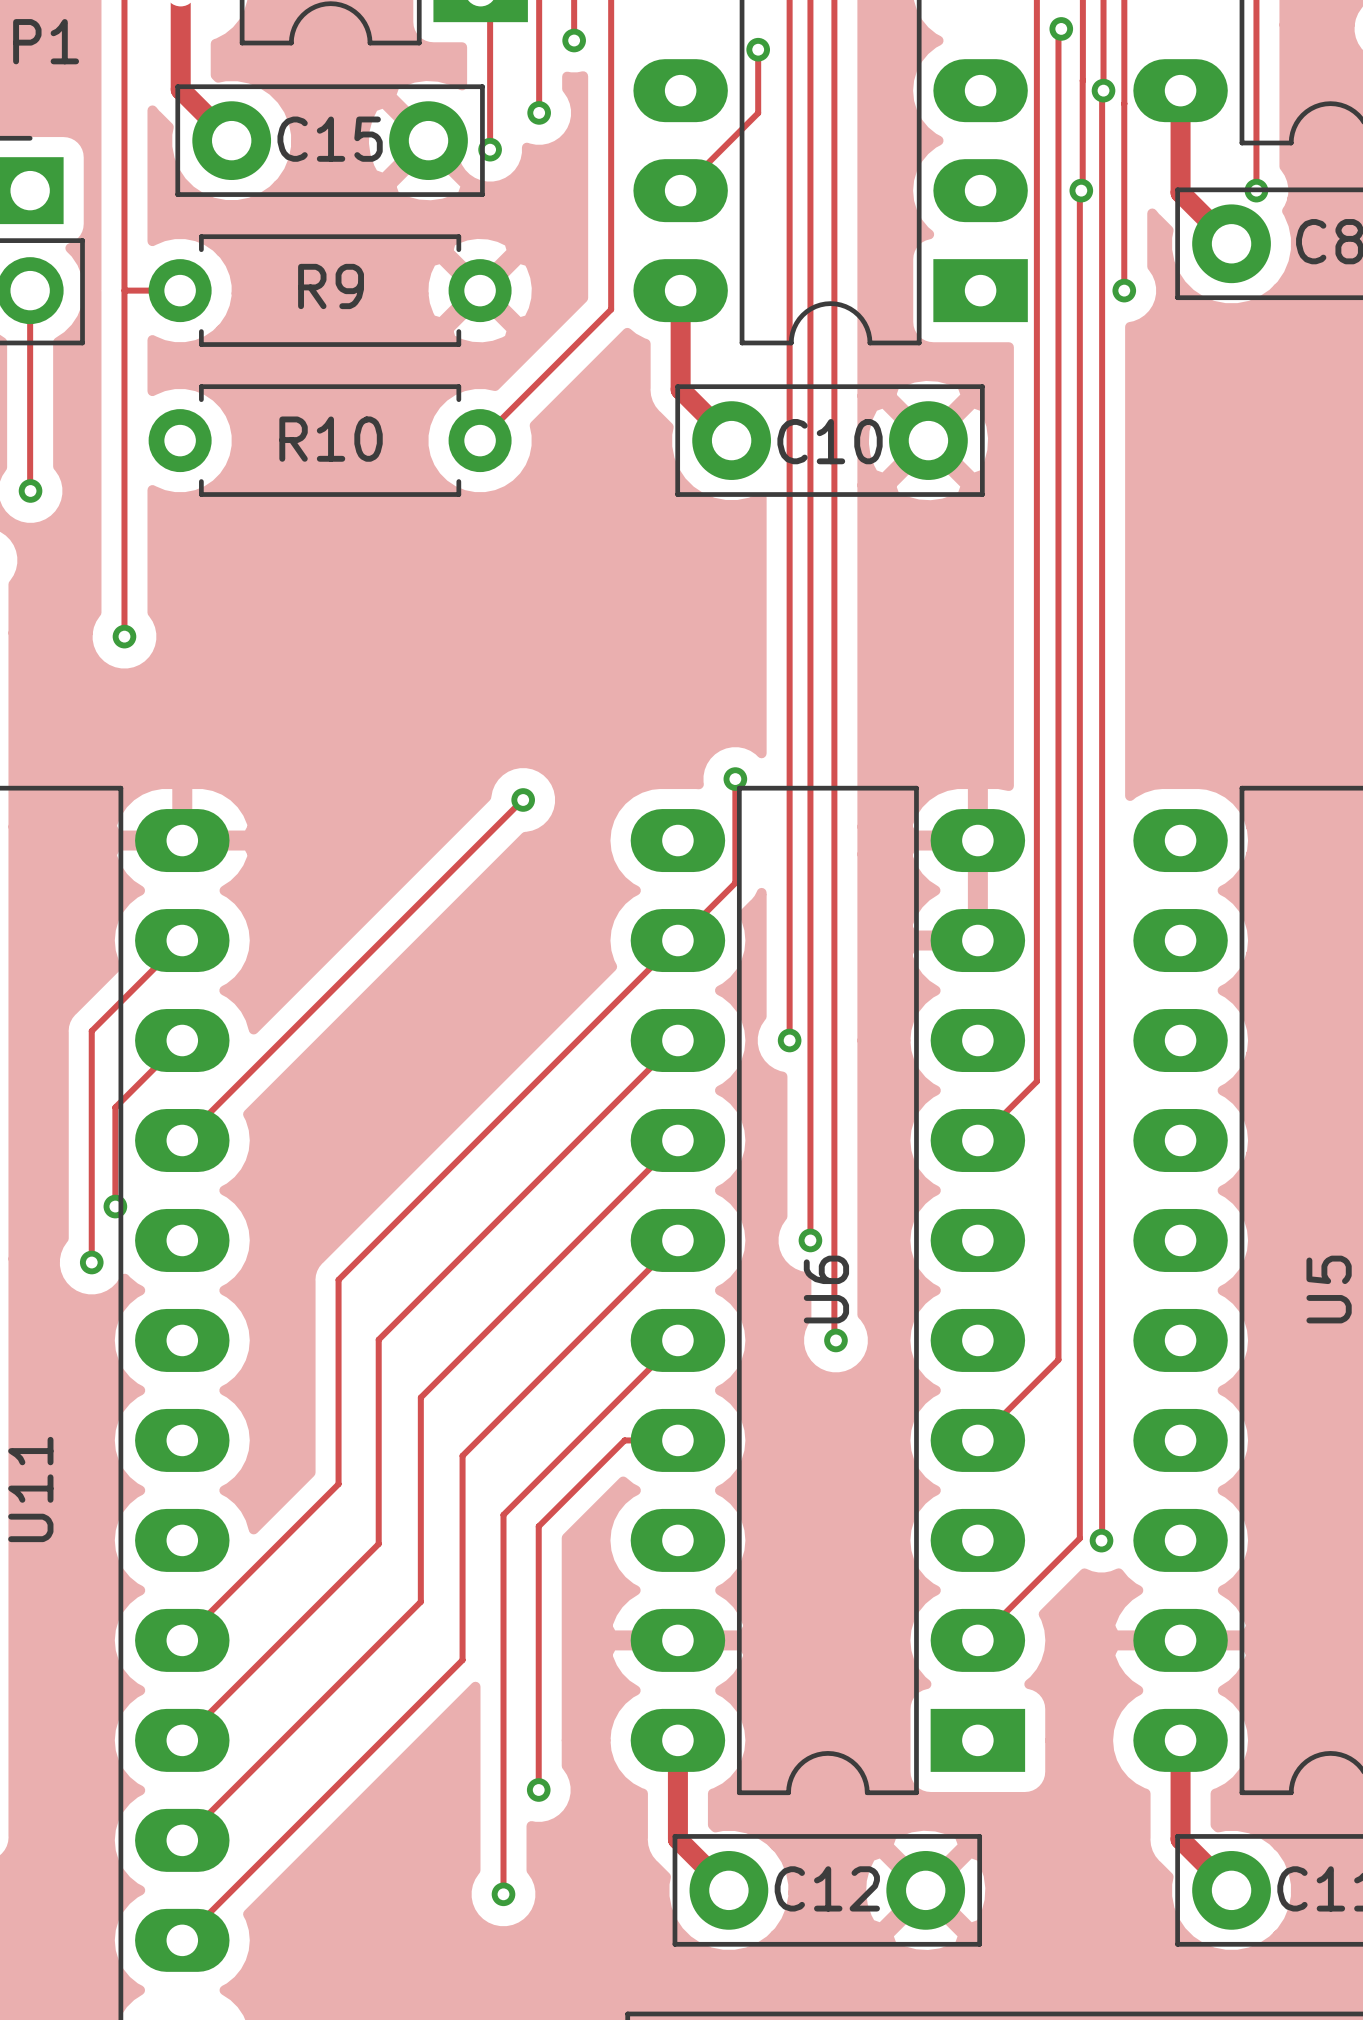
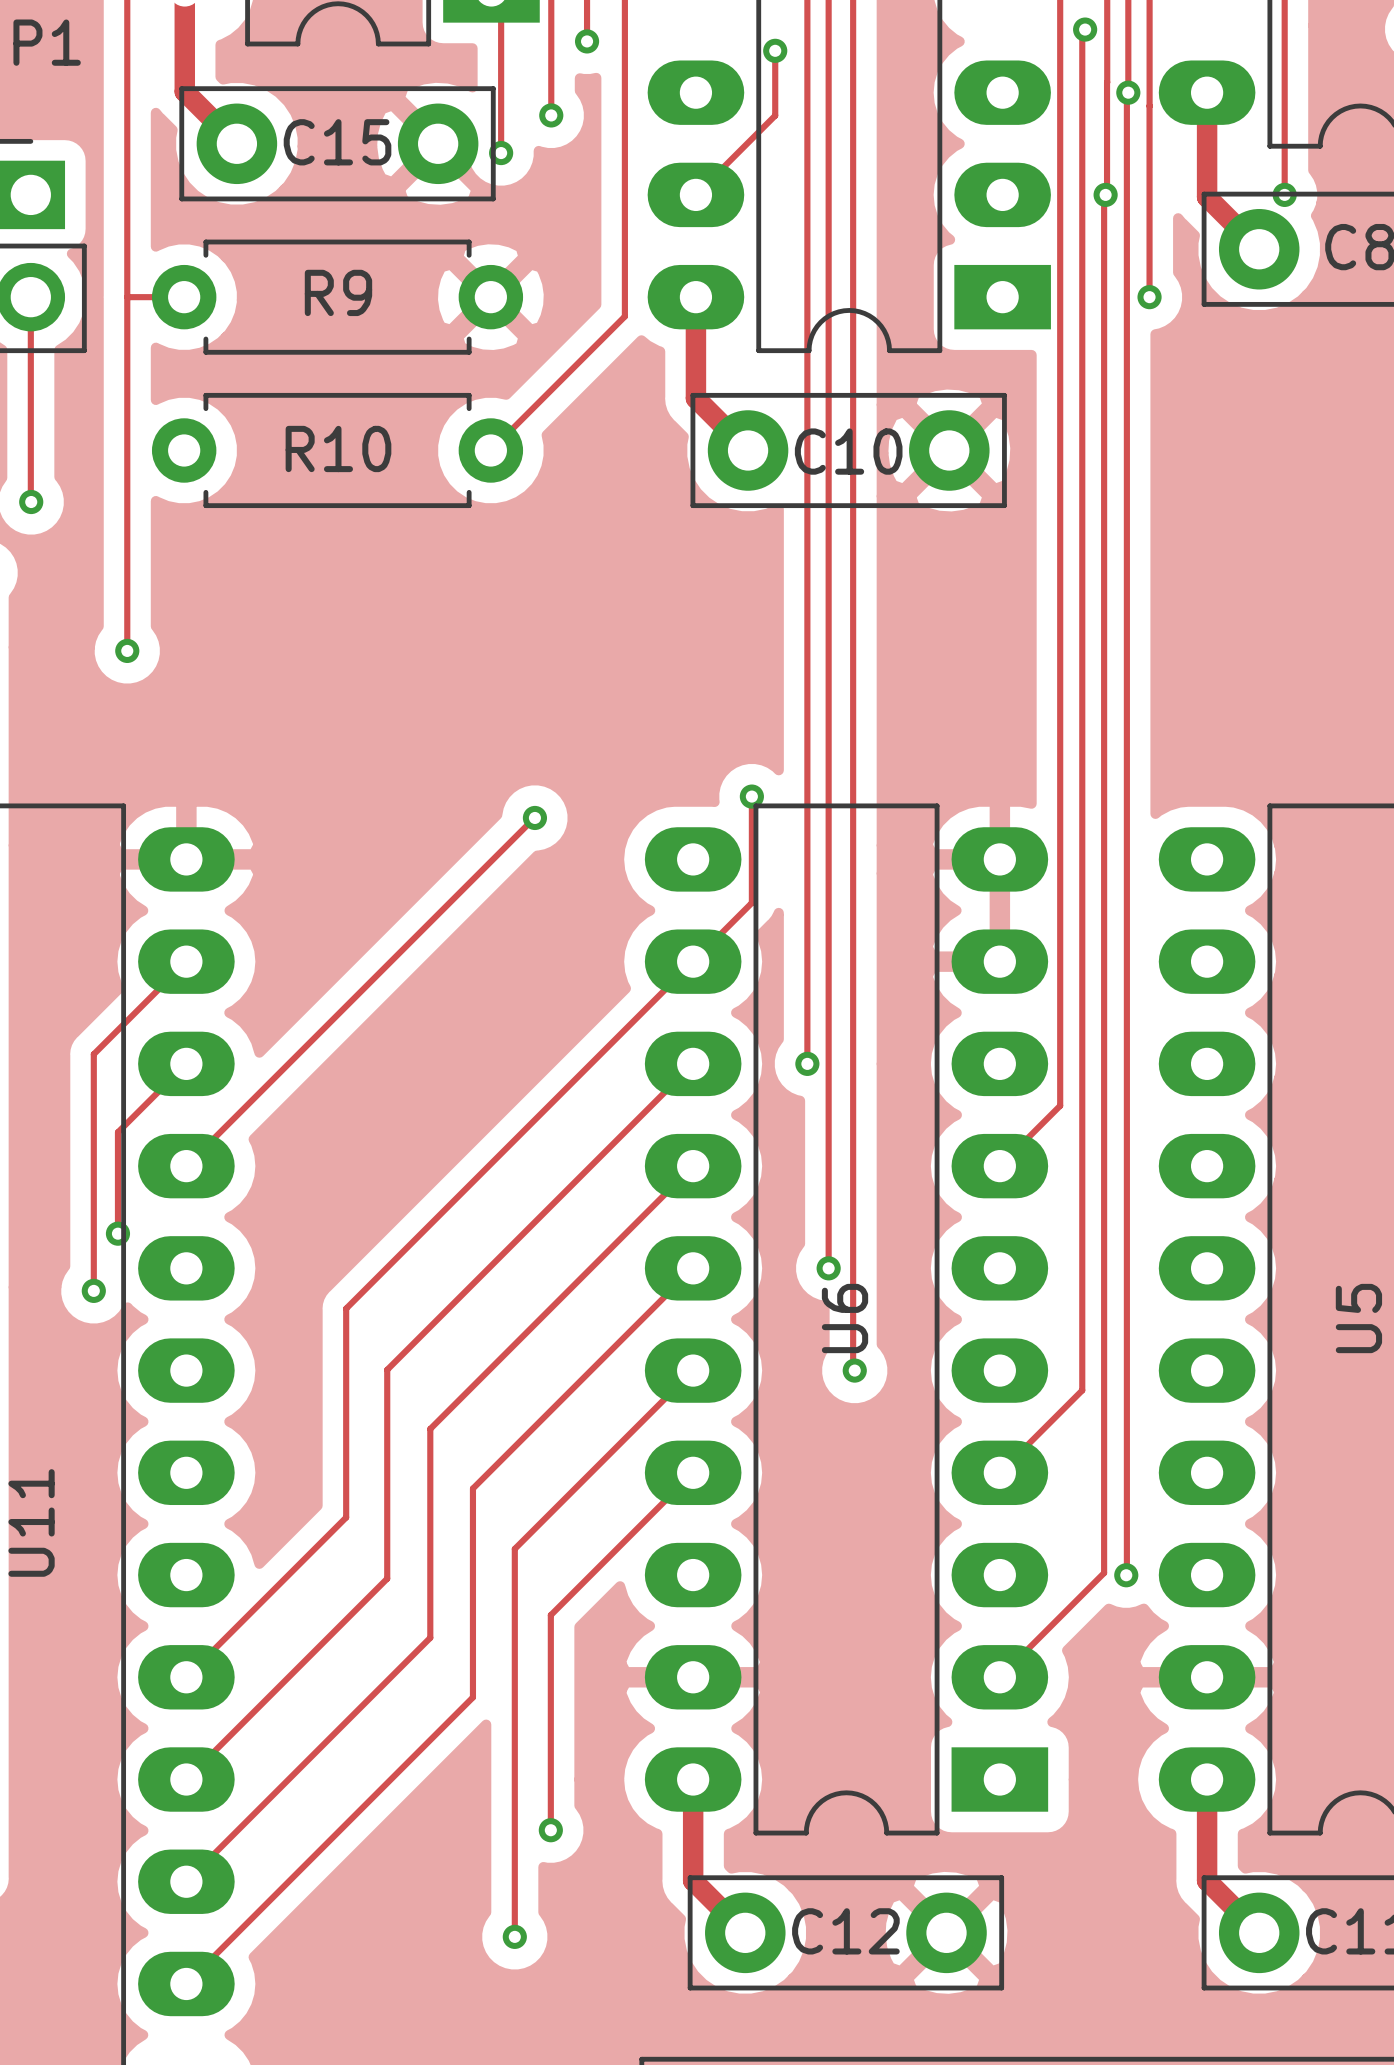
track: (677, 1440) (624, 1440) (538, 1526) (538, 1579) -> (693, 1472) (550, 1615)

